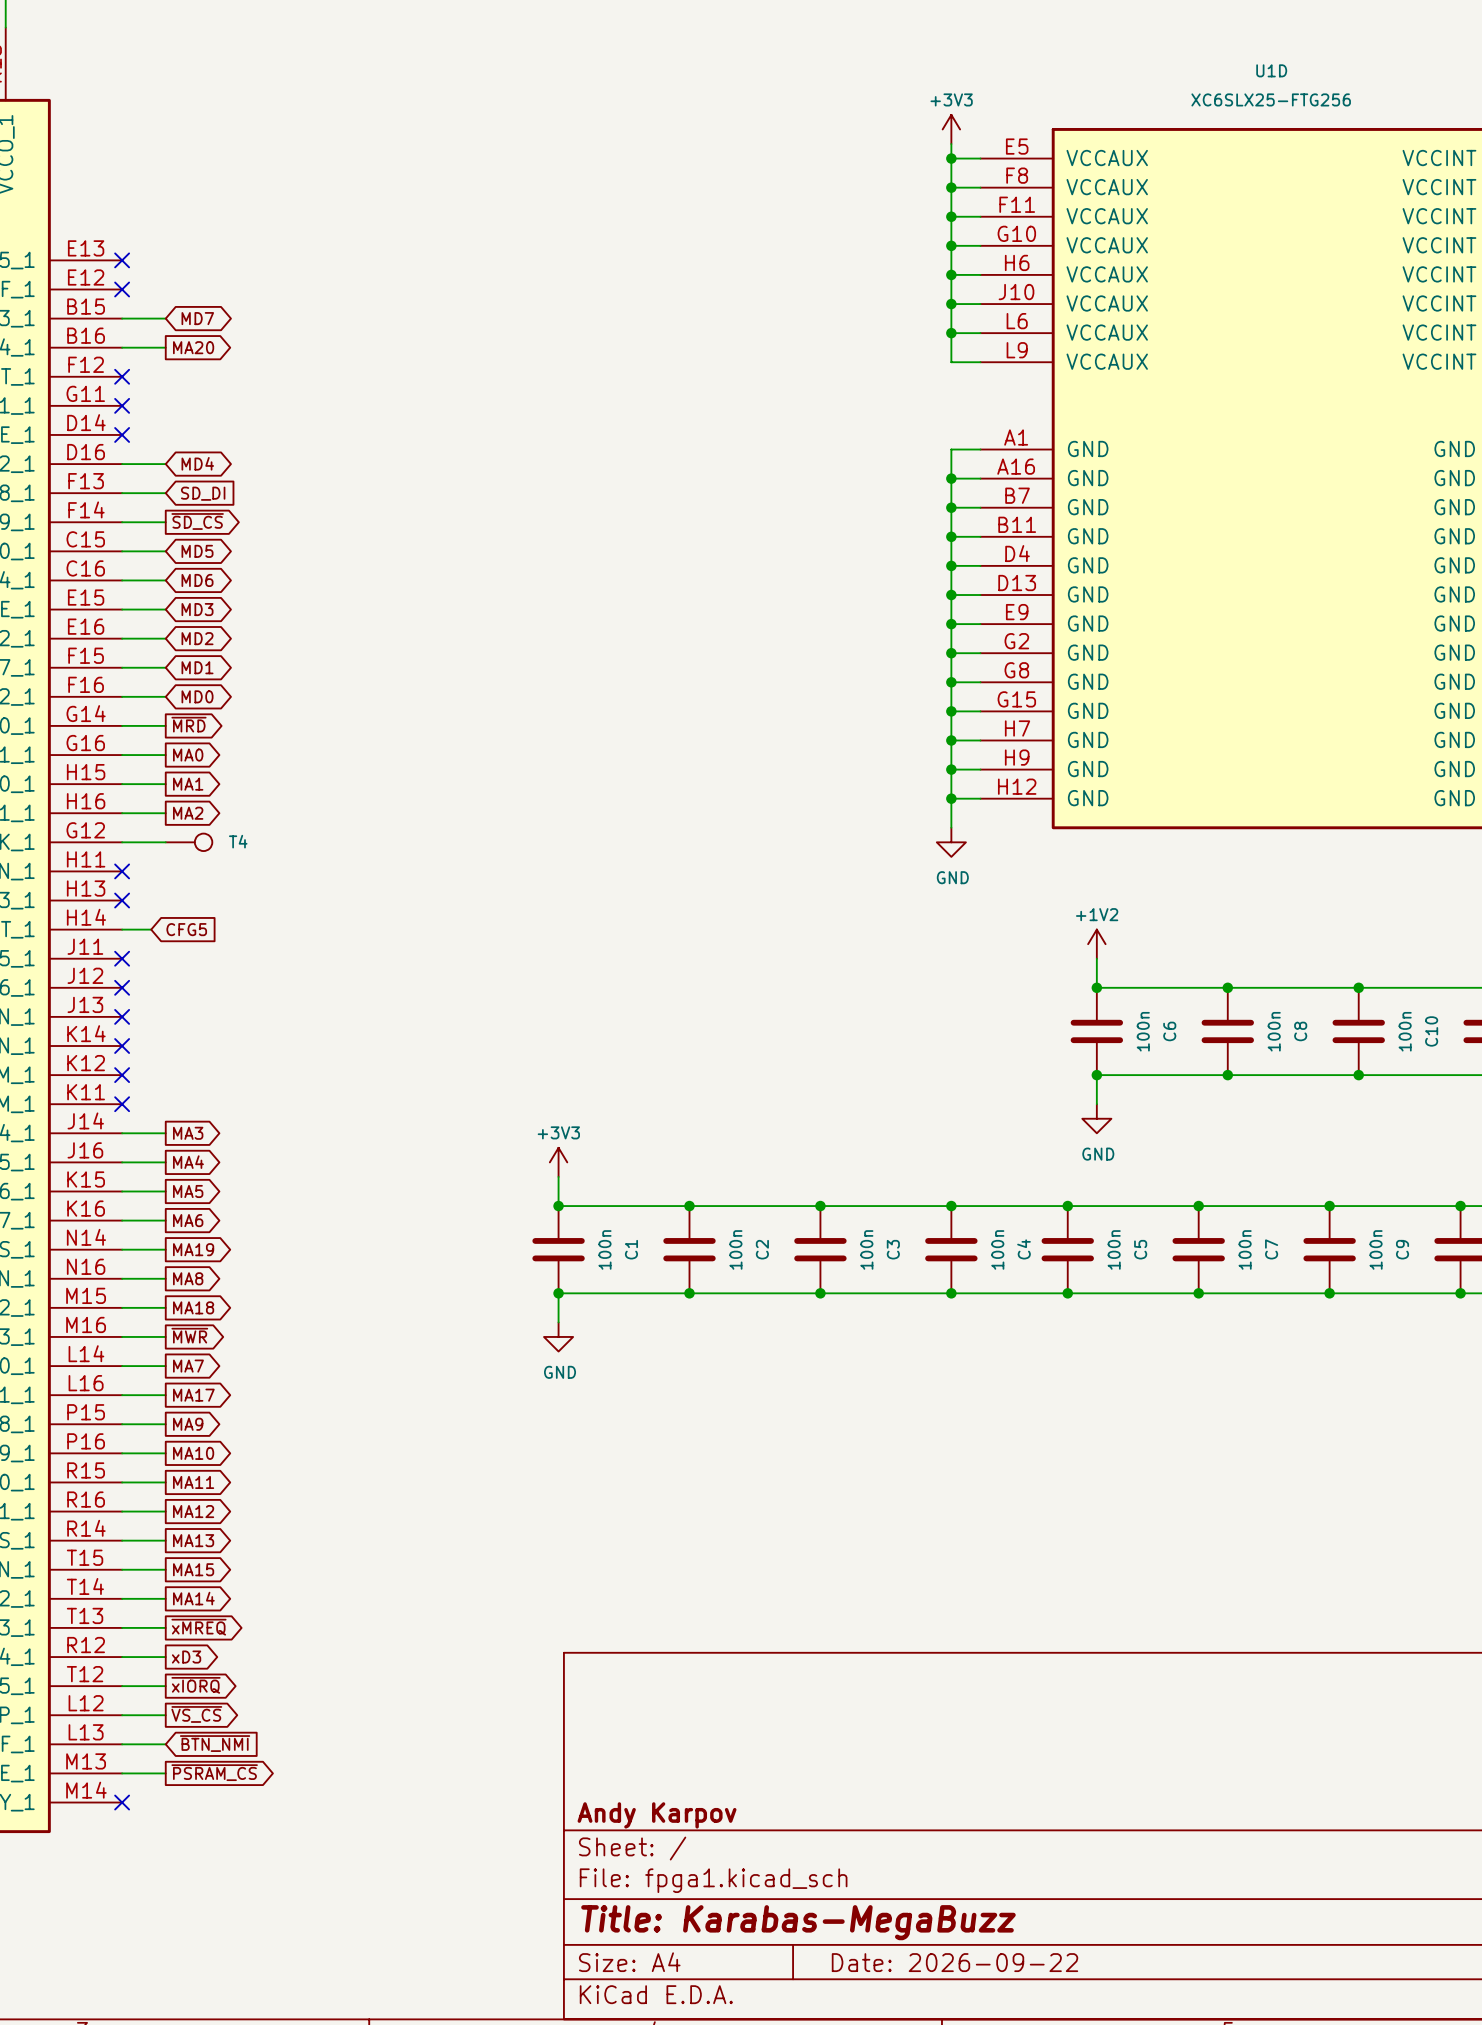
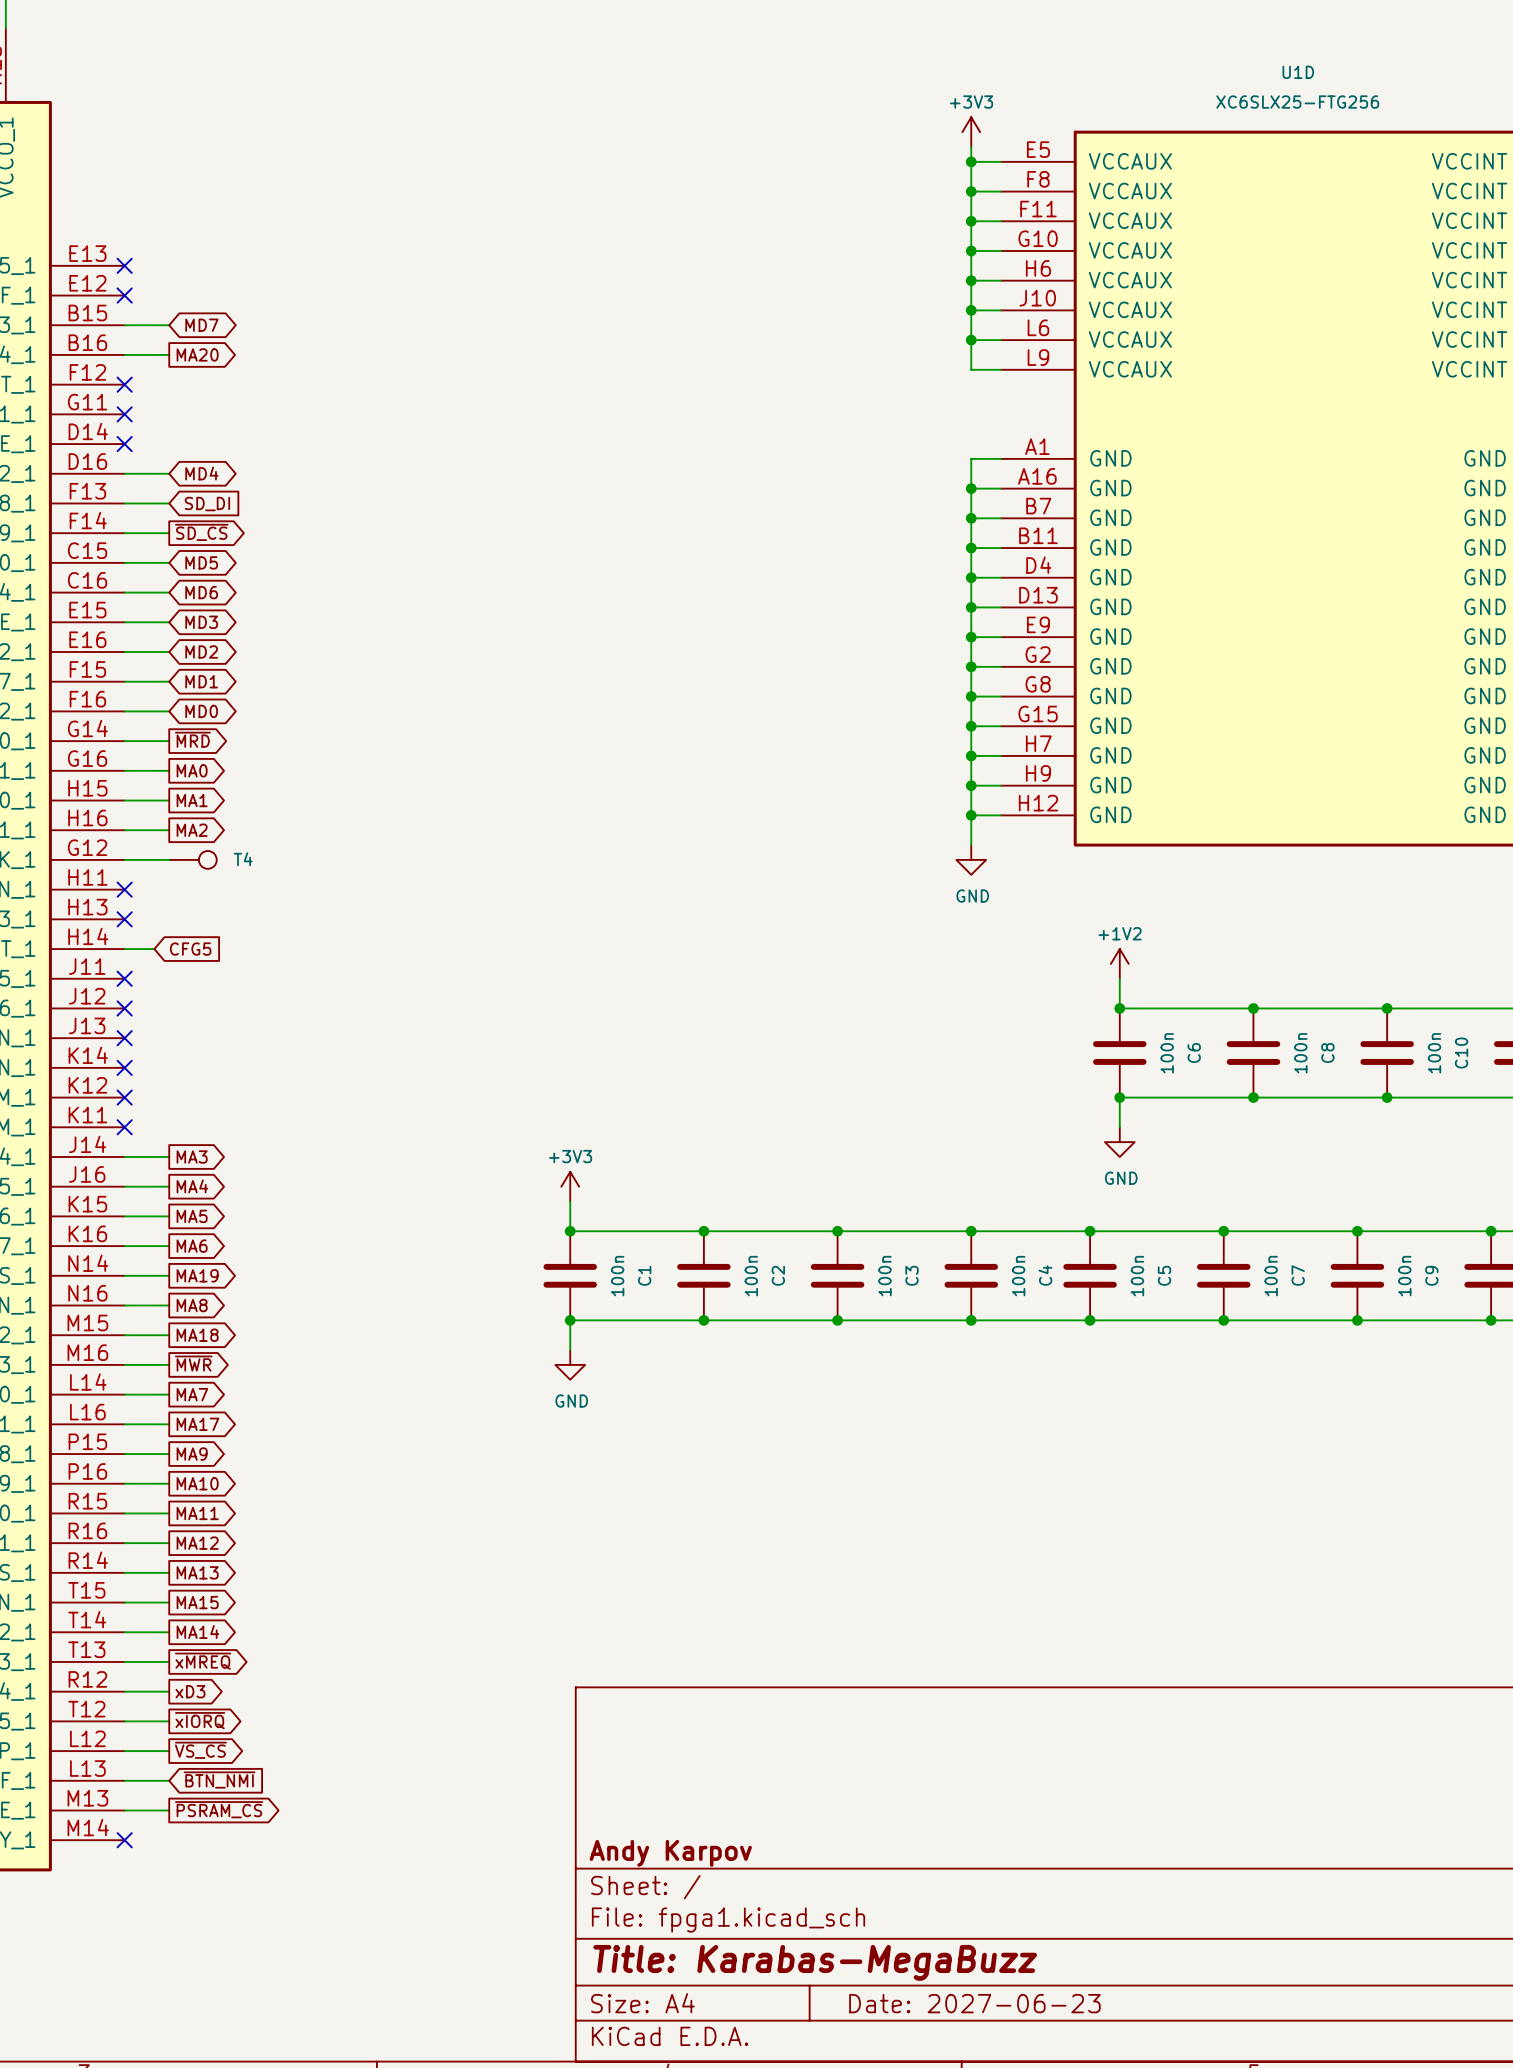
title block: Date: 2026-09-22 (954, 1962) -> Date: 2027-06-23 (974, 2003)

